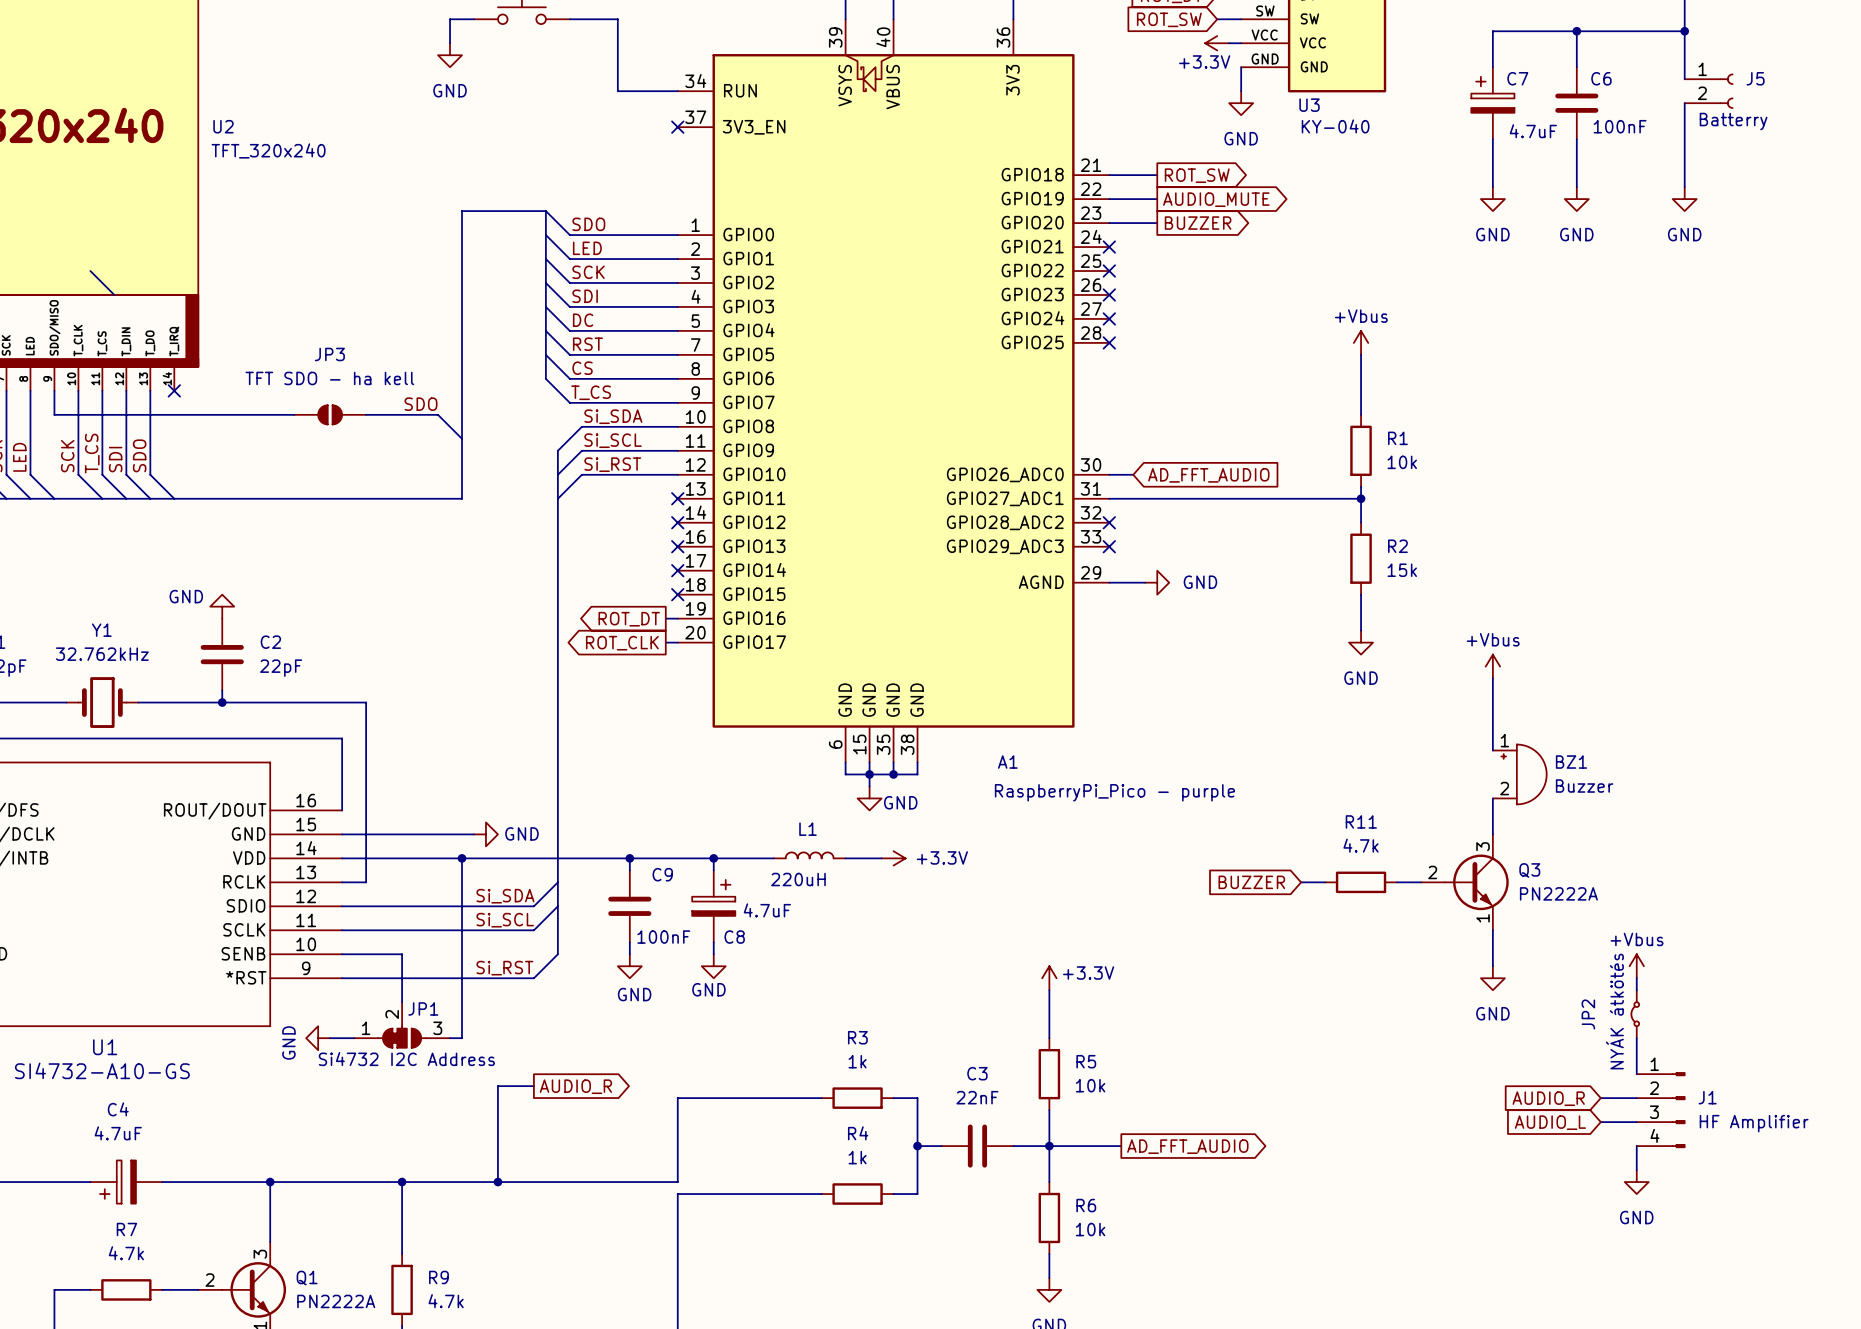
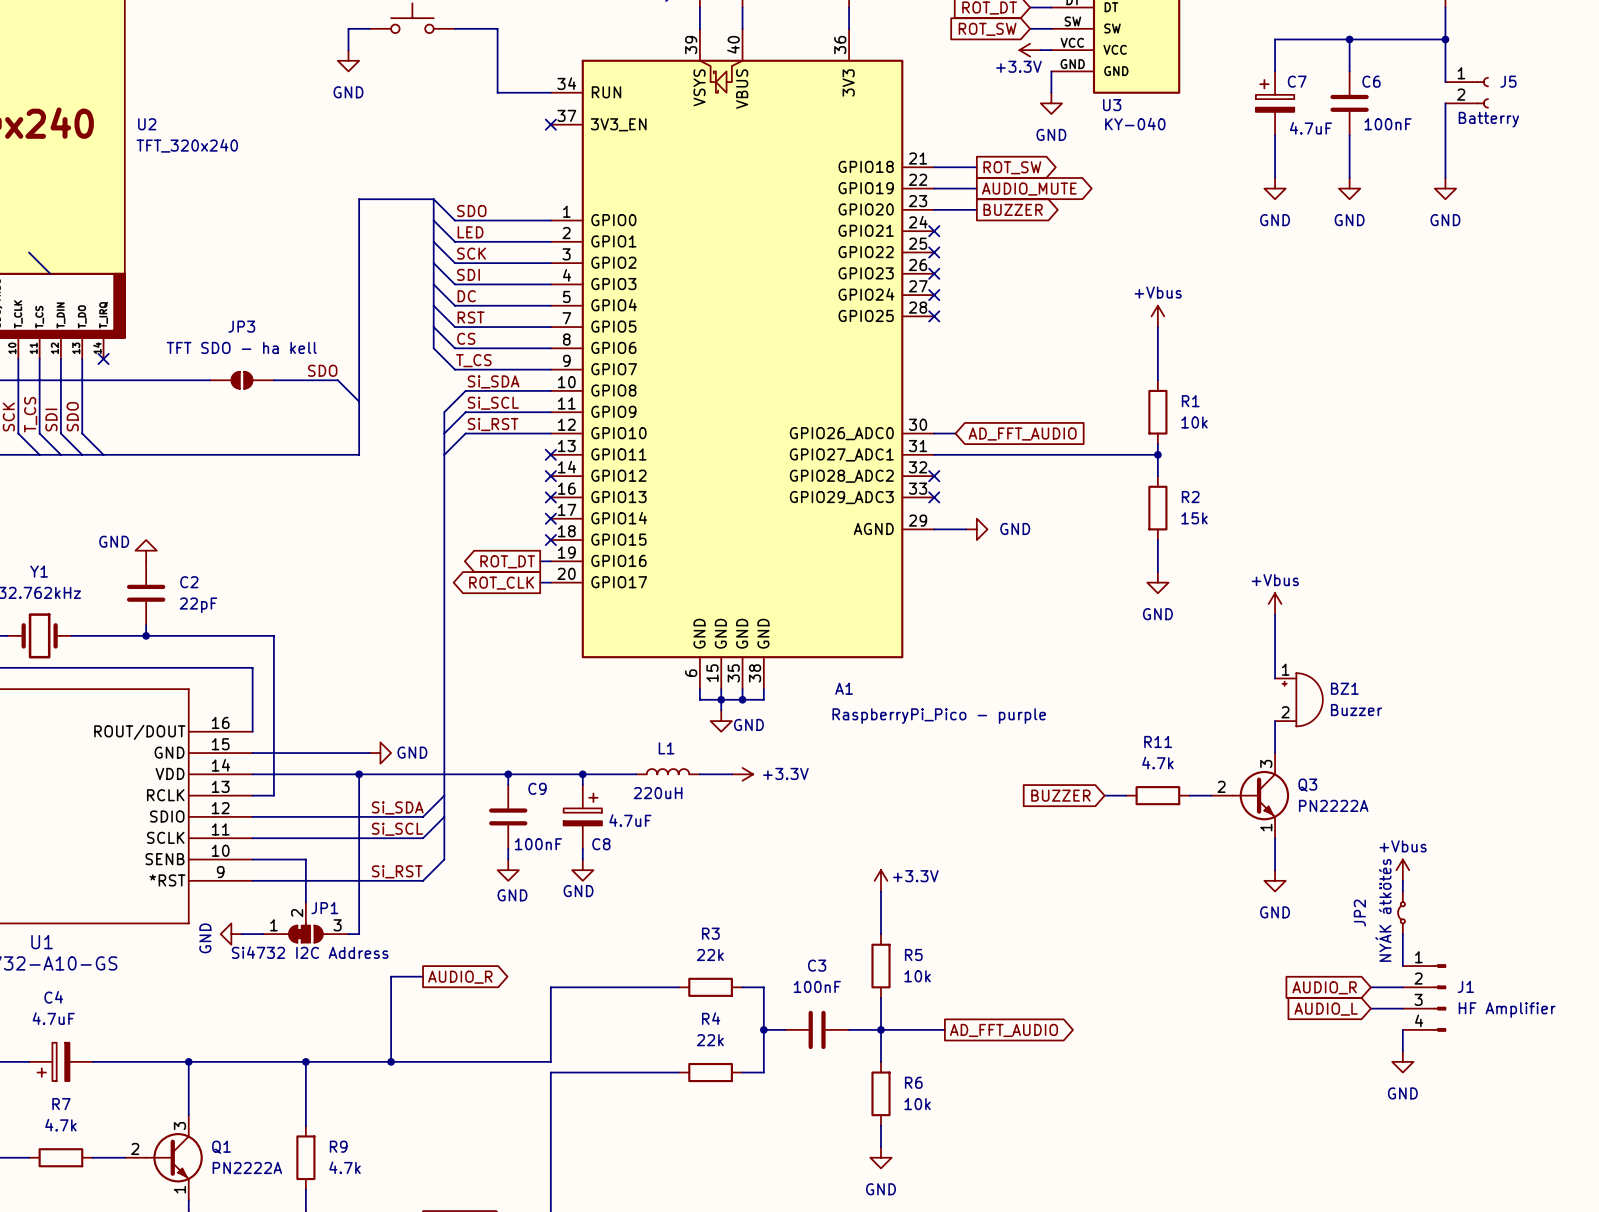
R3 value: 1k (857, 1061) -> 22k (710, 954)
C3 value: 22nF (977, 1097) -> 100nF (817, 986)
R4 value: 1k (857, 1157) -> 22k (710, 1040)

